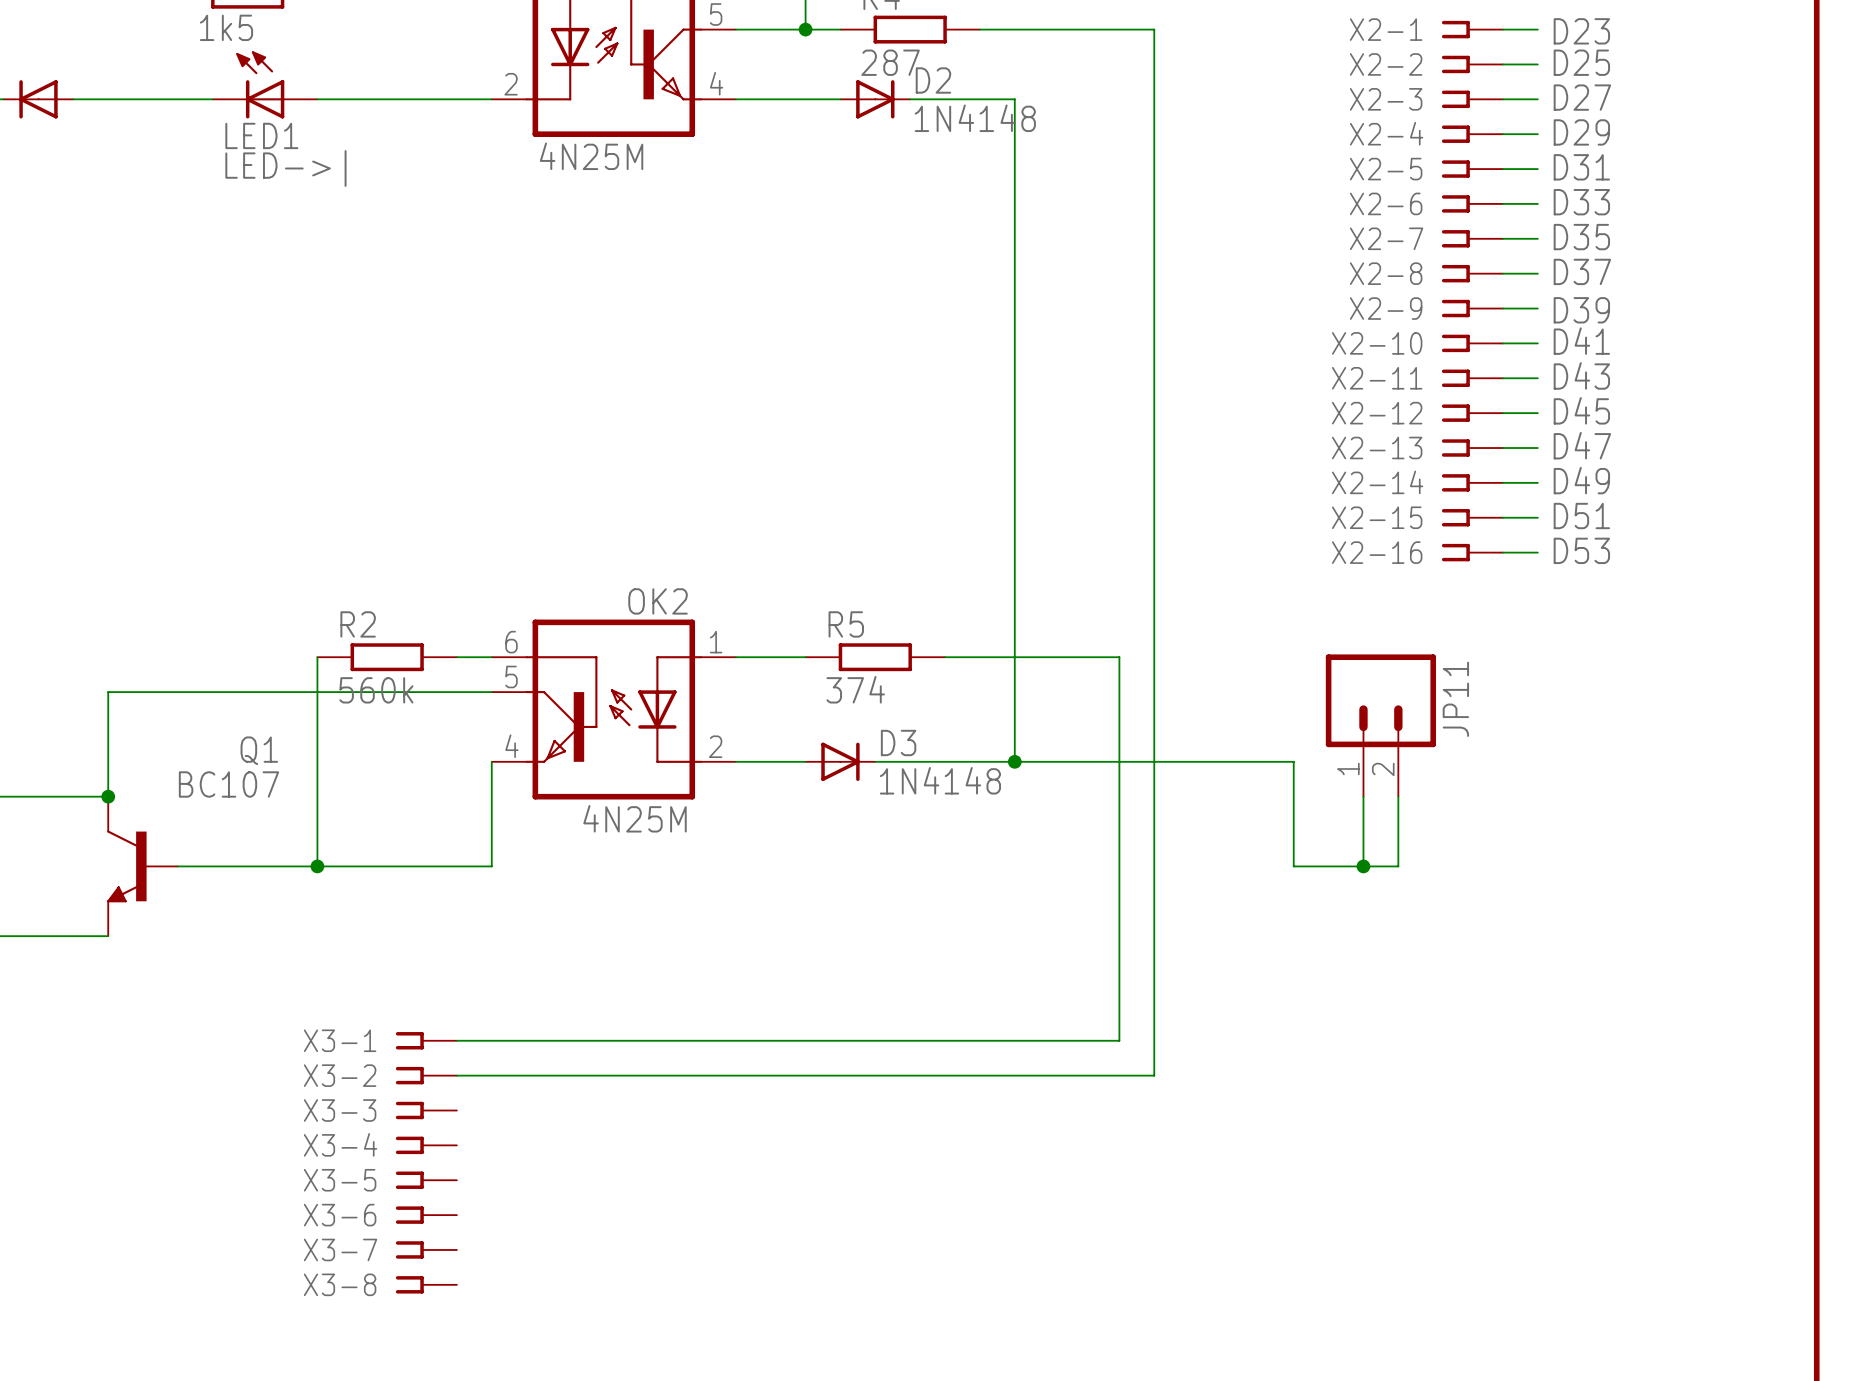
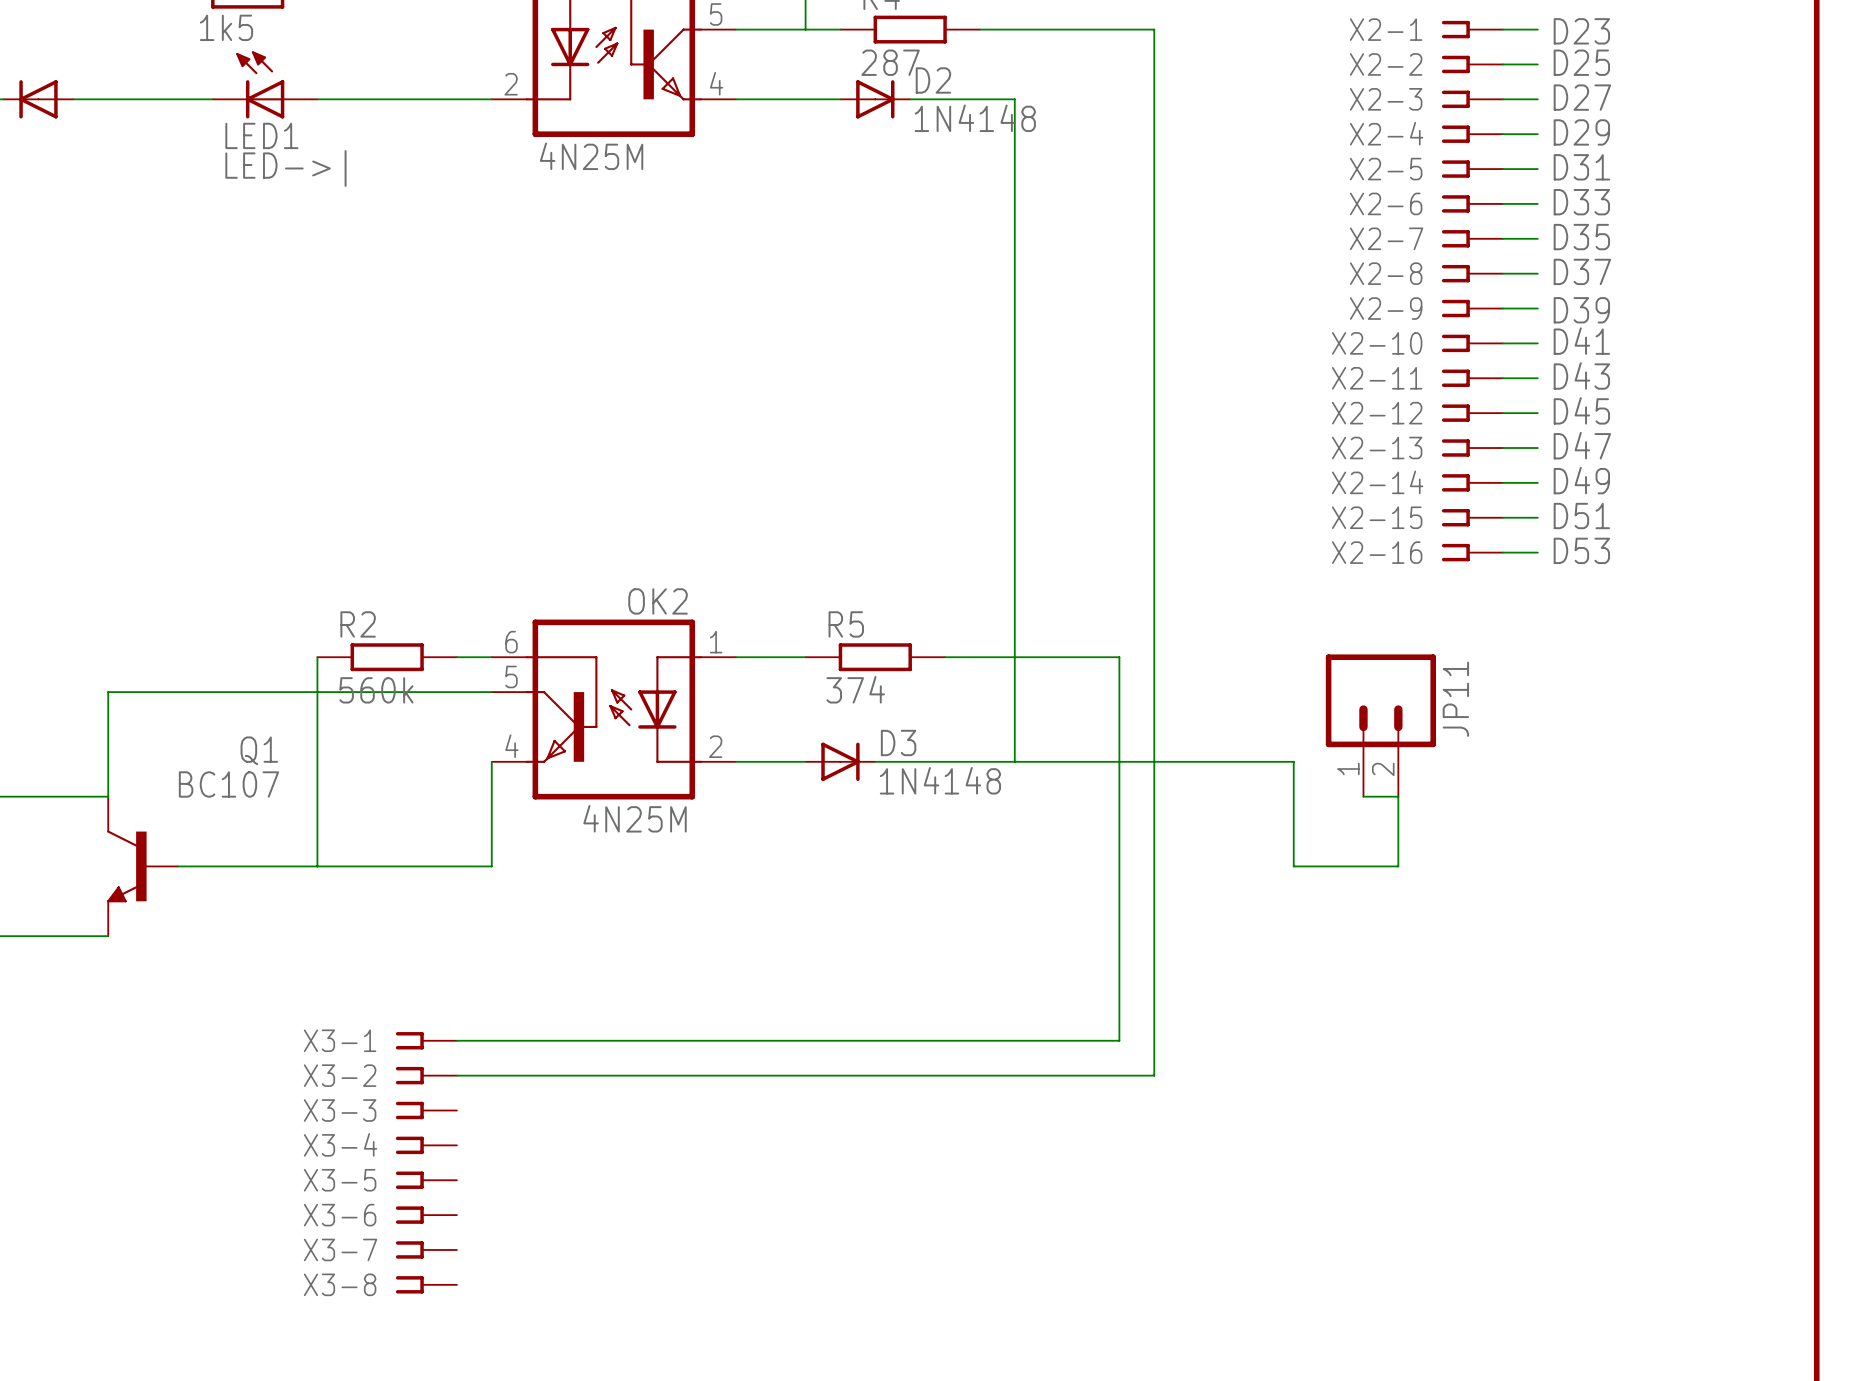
junction: (805, 29) -> none
junction: (1014, 761) -> none
junction: (108, 796) -> none
wire: (1363, 796) (1363, 866) -> (1363, 796) (1398, 796)
junction: (317, 866) -> none
junction: (1363, 866) -> none

